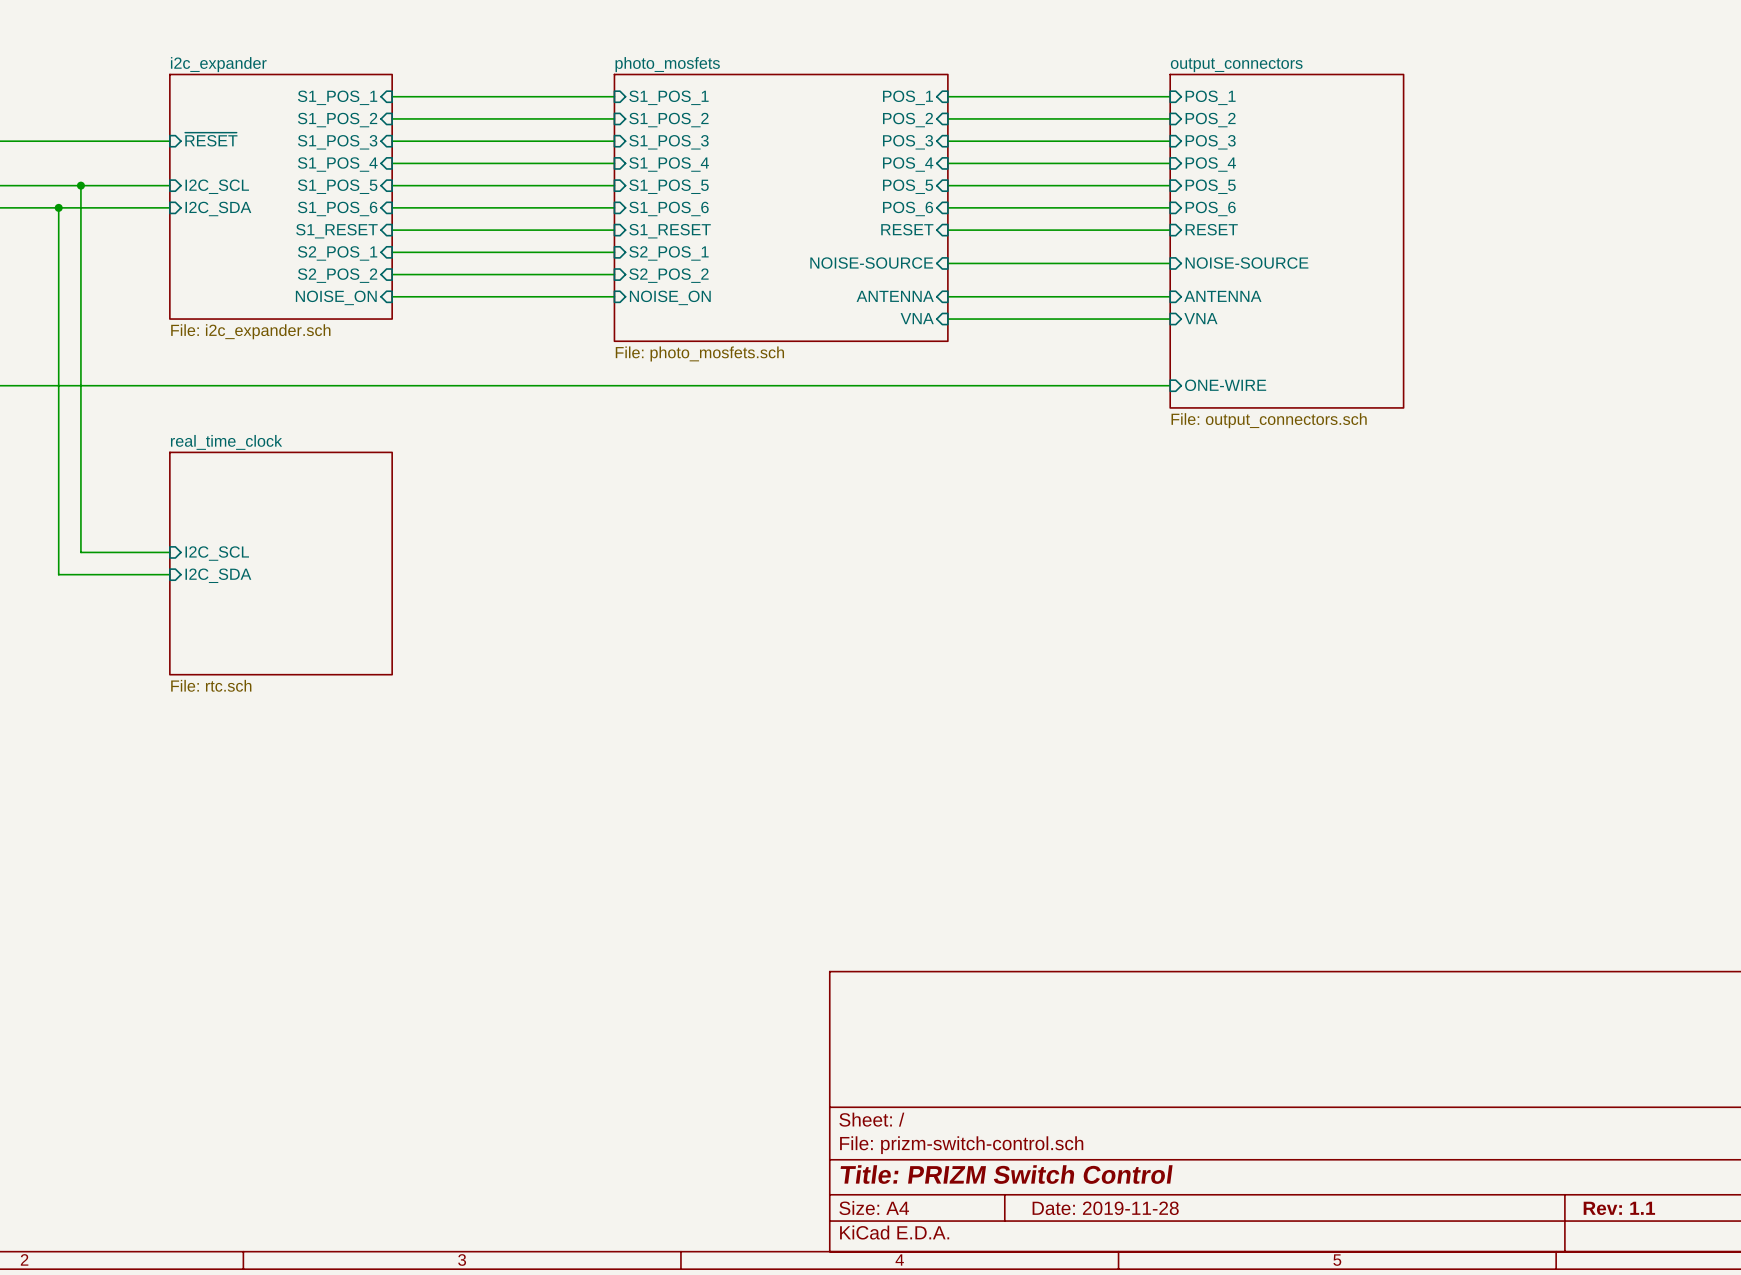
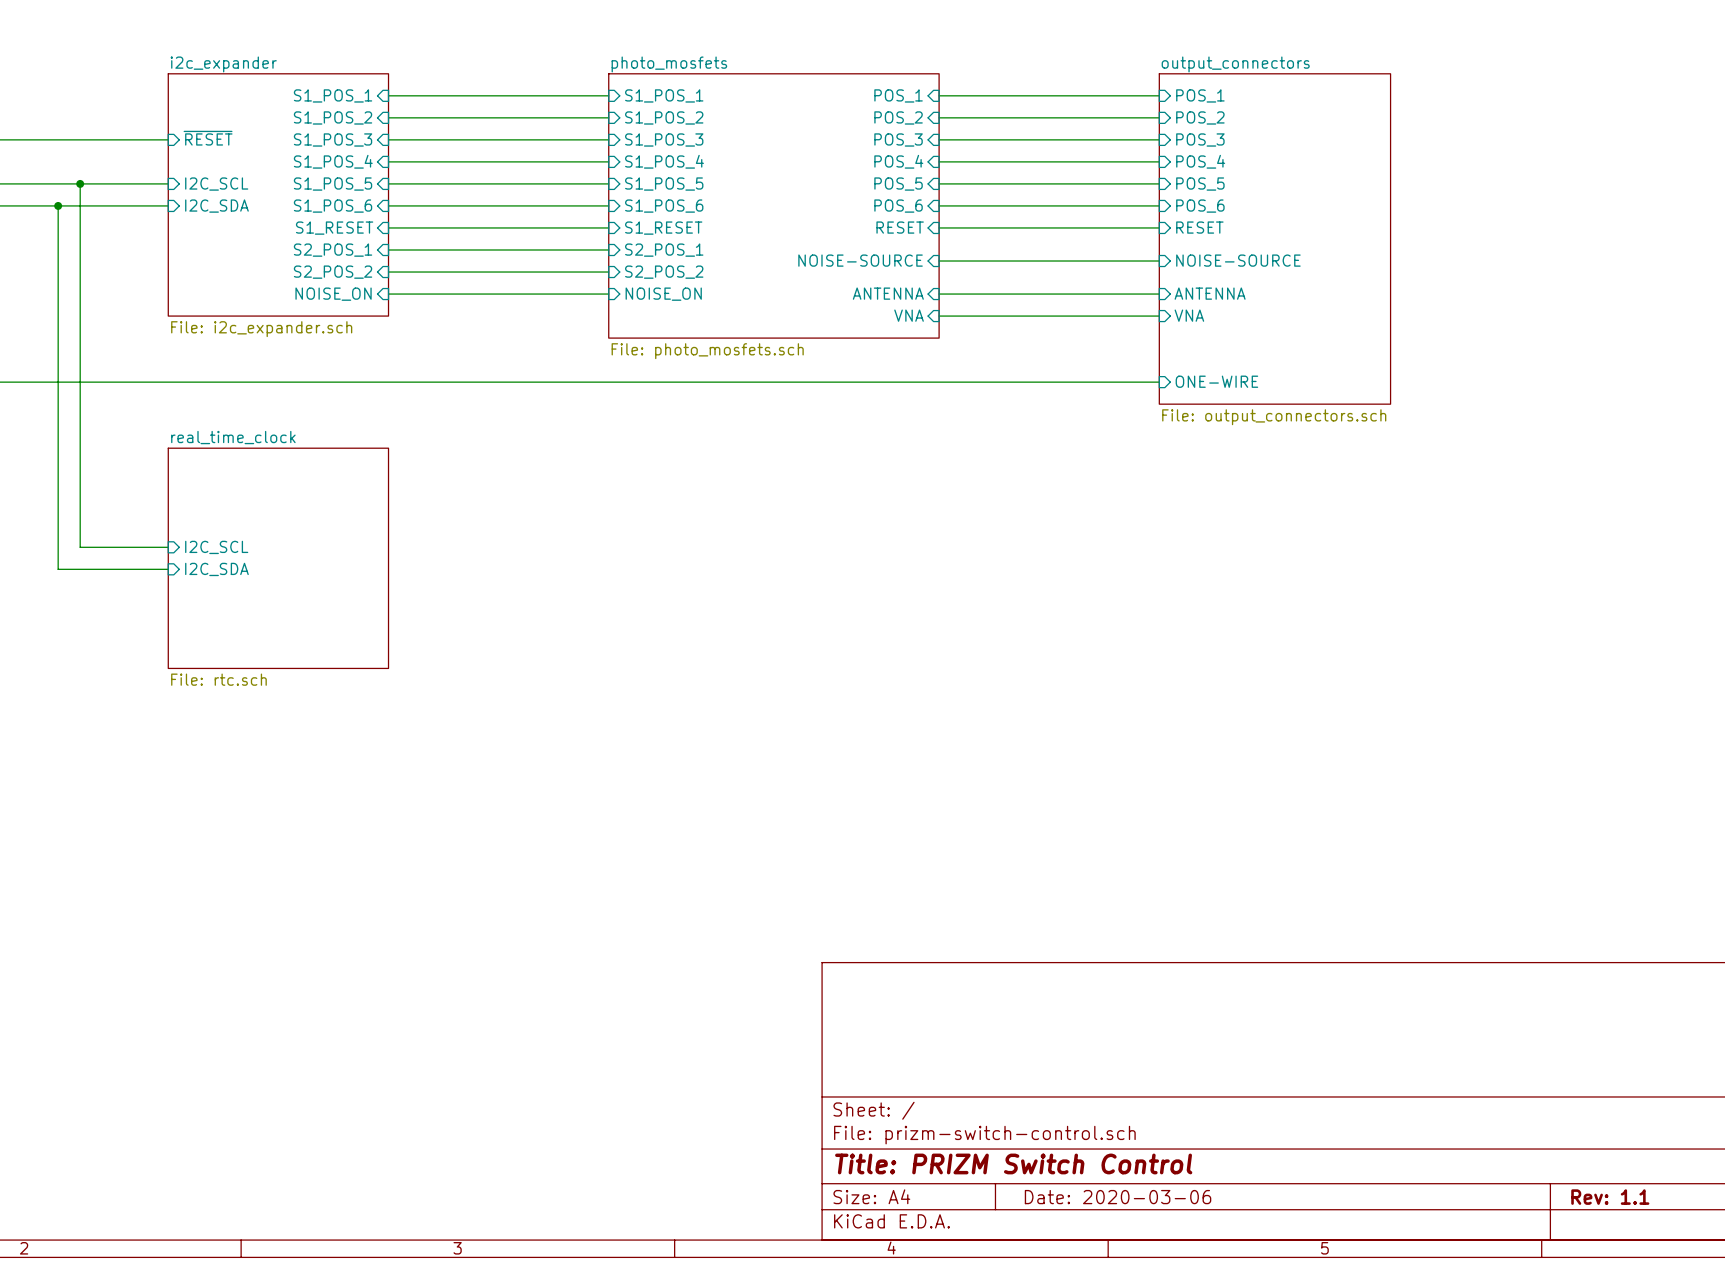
title block: Date: 2019-11-28 (1105, 1208) -> Date: 2020-03-06 (1118, 1197)

